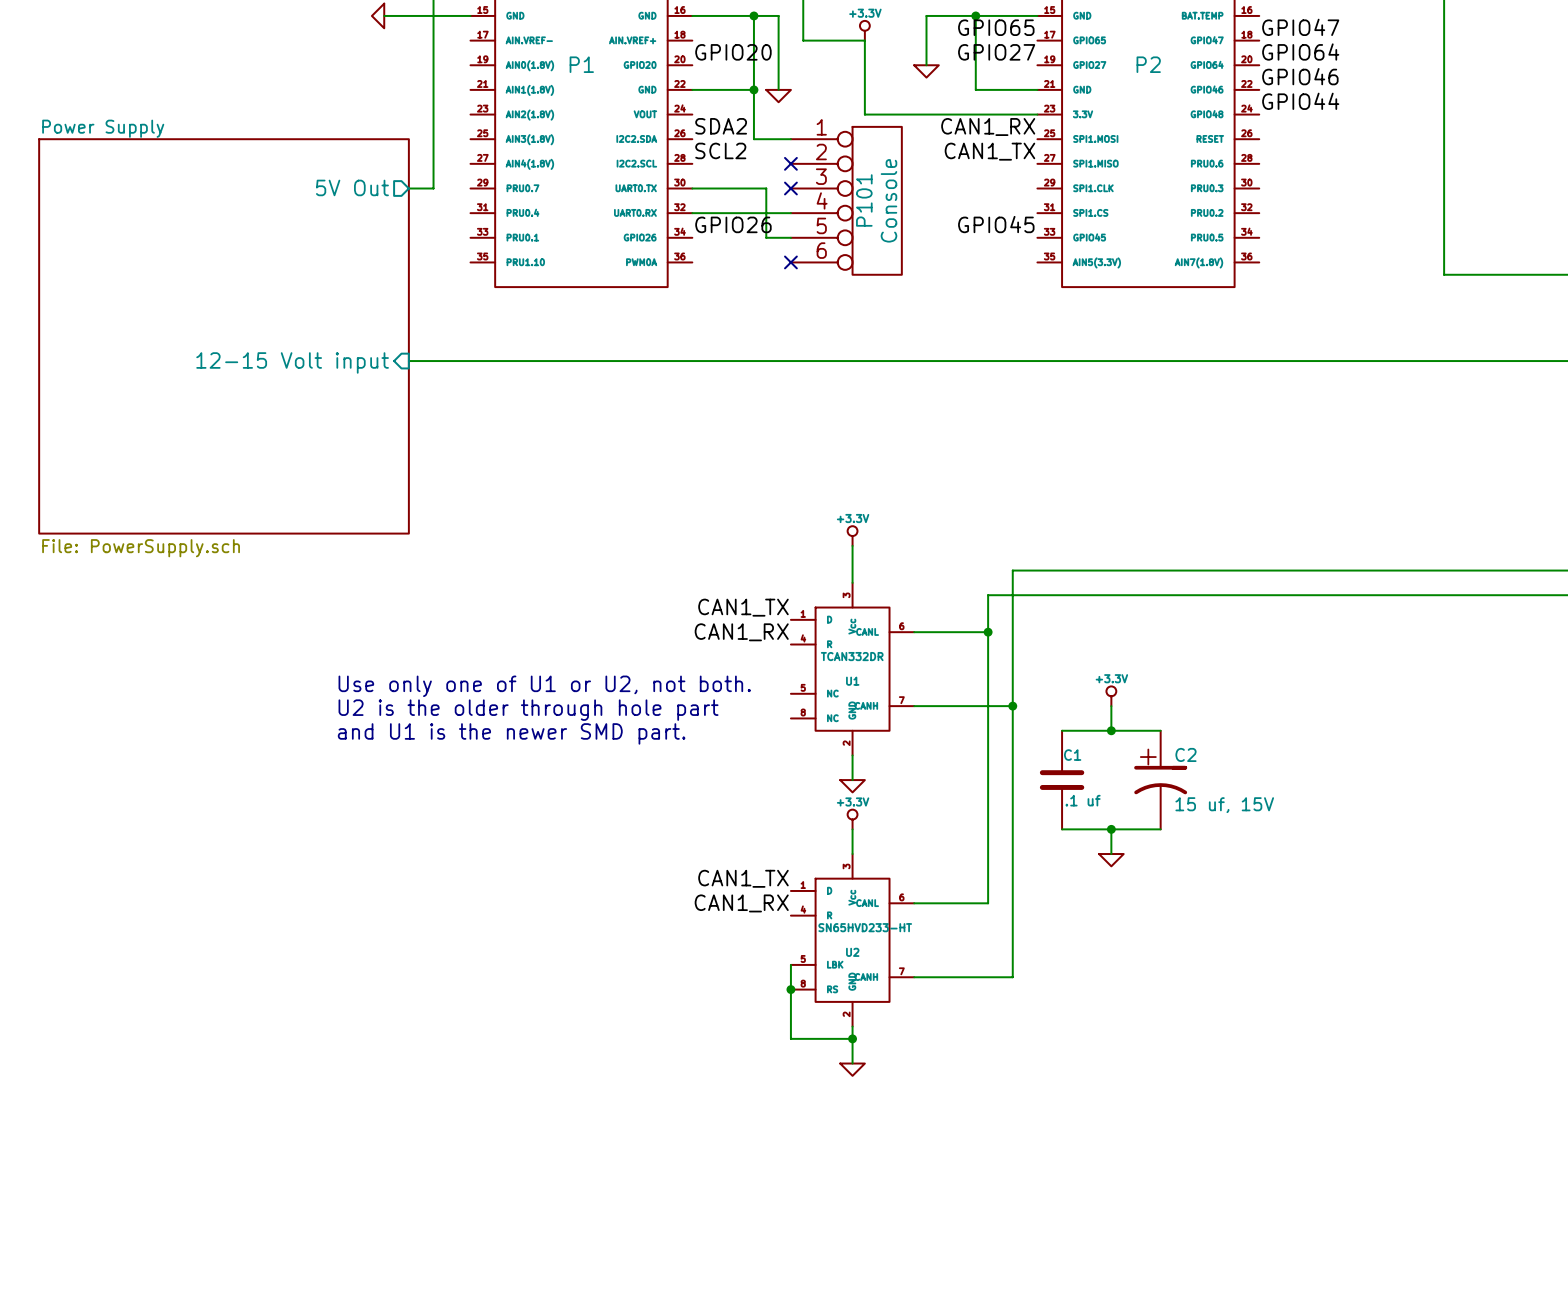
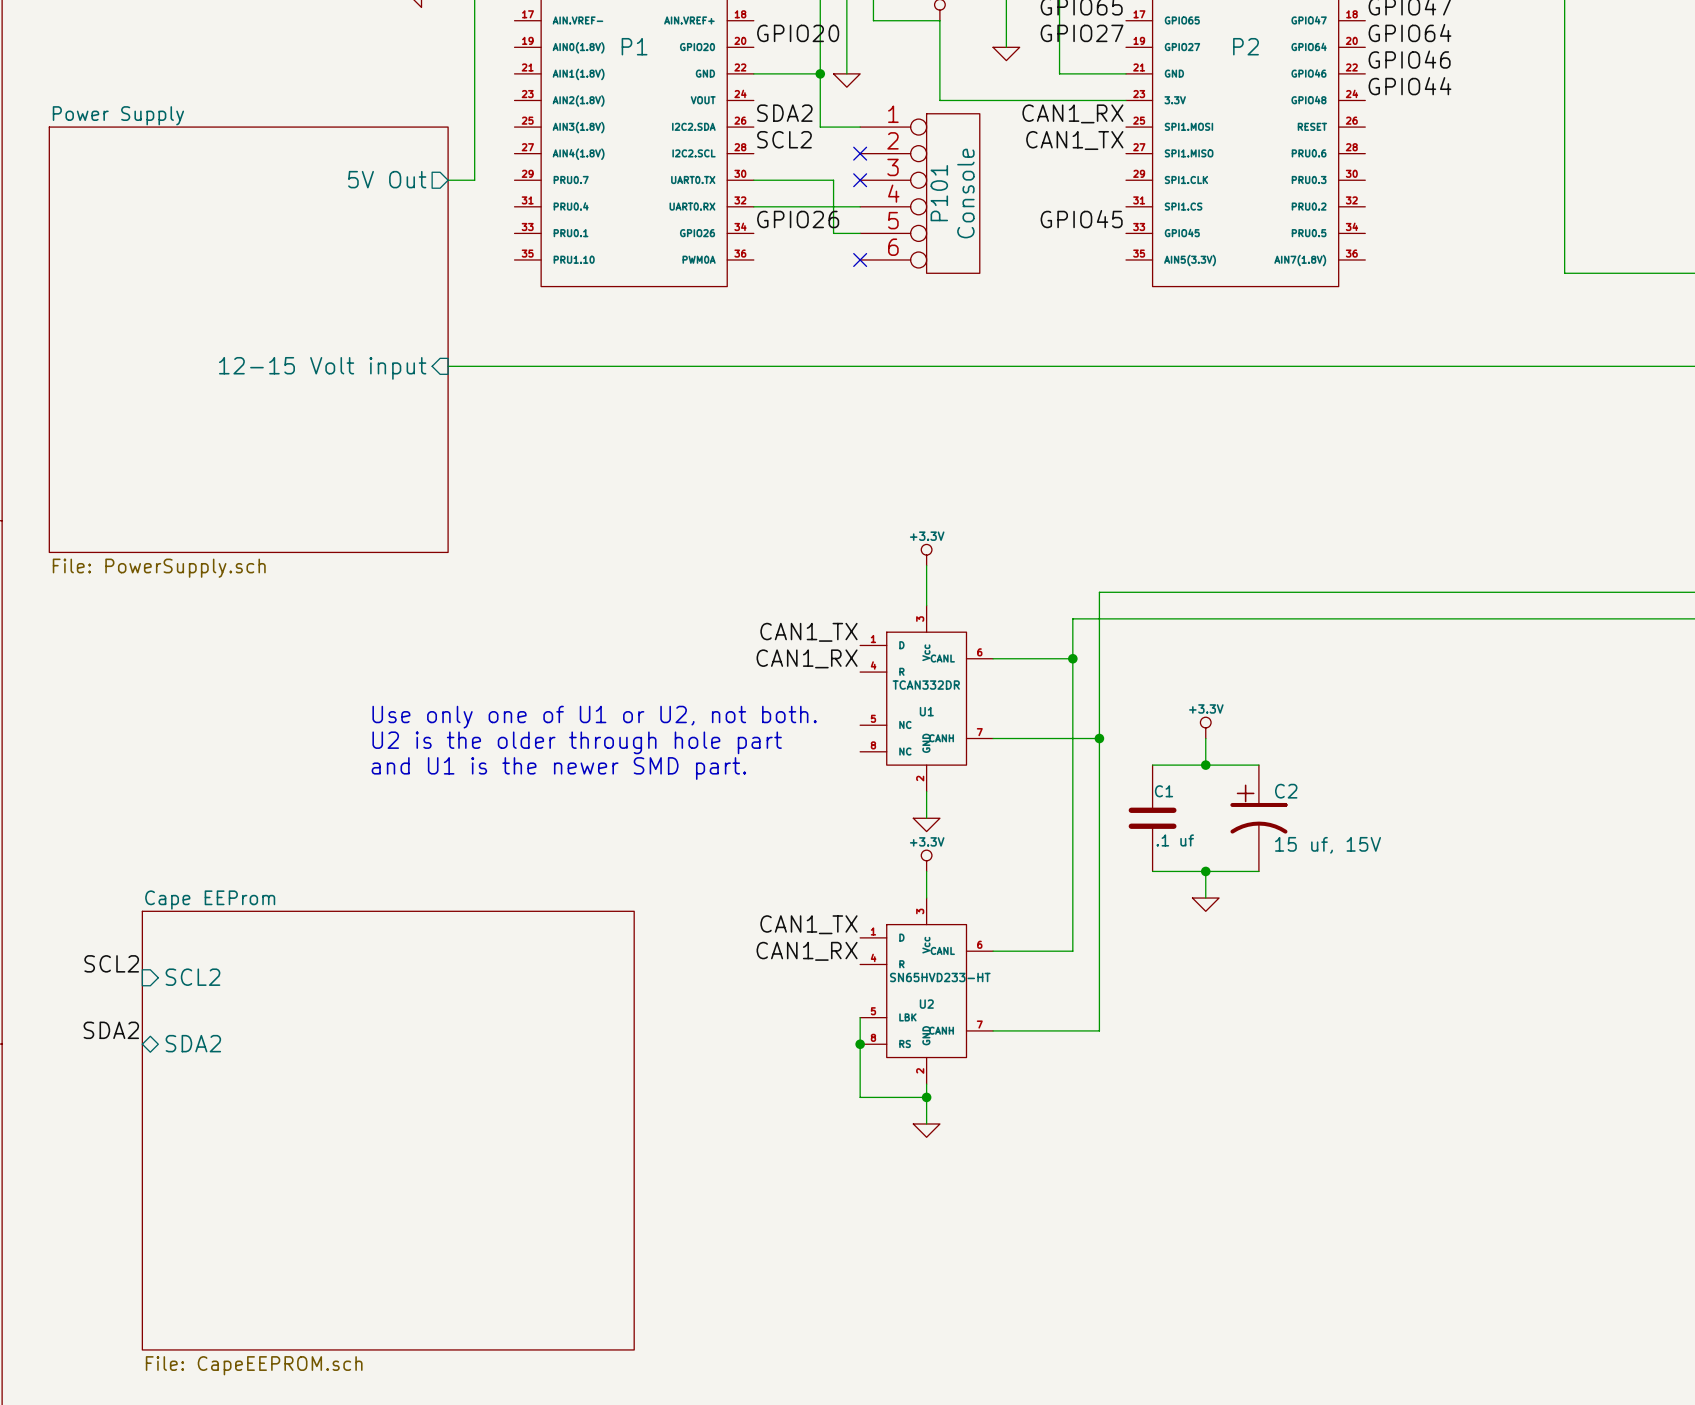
label: none -> SCL2 (111, 963)
sheet pin: none -> SCL2 (192, 977)
label: none -> SDA2 (111, 1030)
sheet pin: none -> SDA2 (193, 1043)
sheet Cape EEProm: none -> File: CapeEEPROM.sch (388, 1130)

